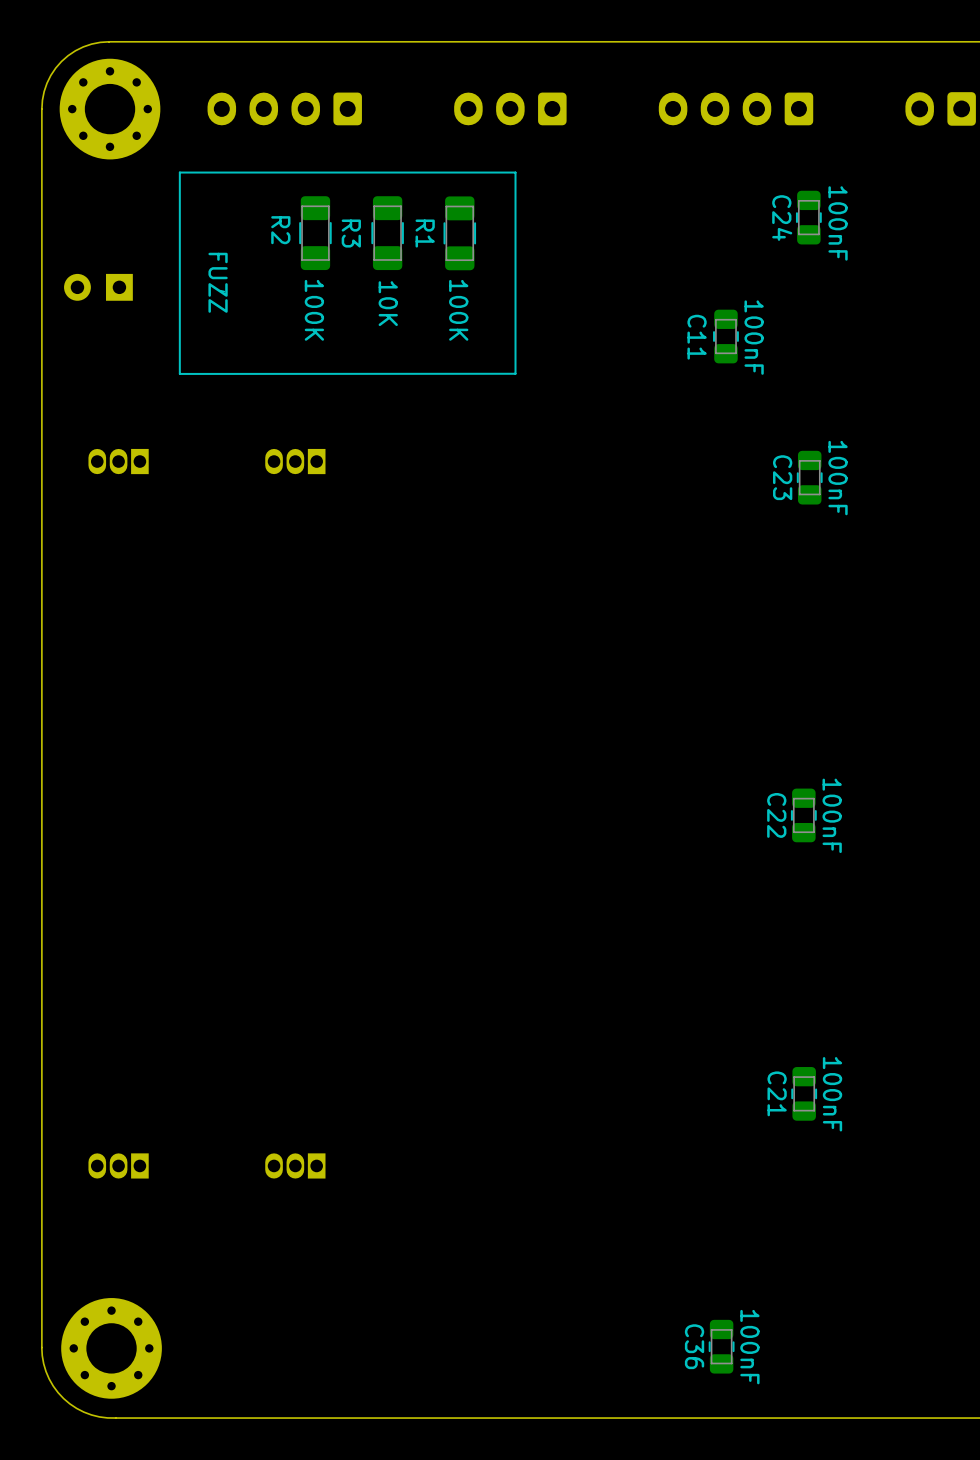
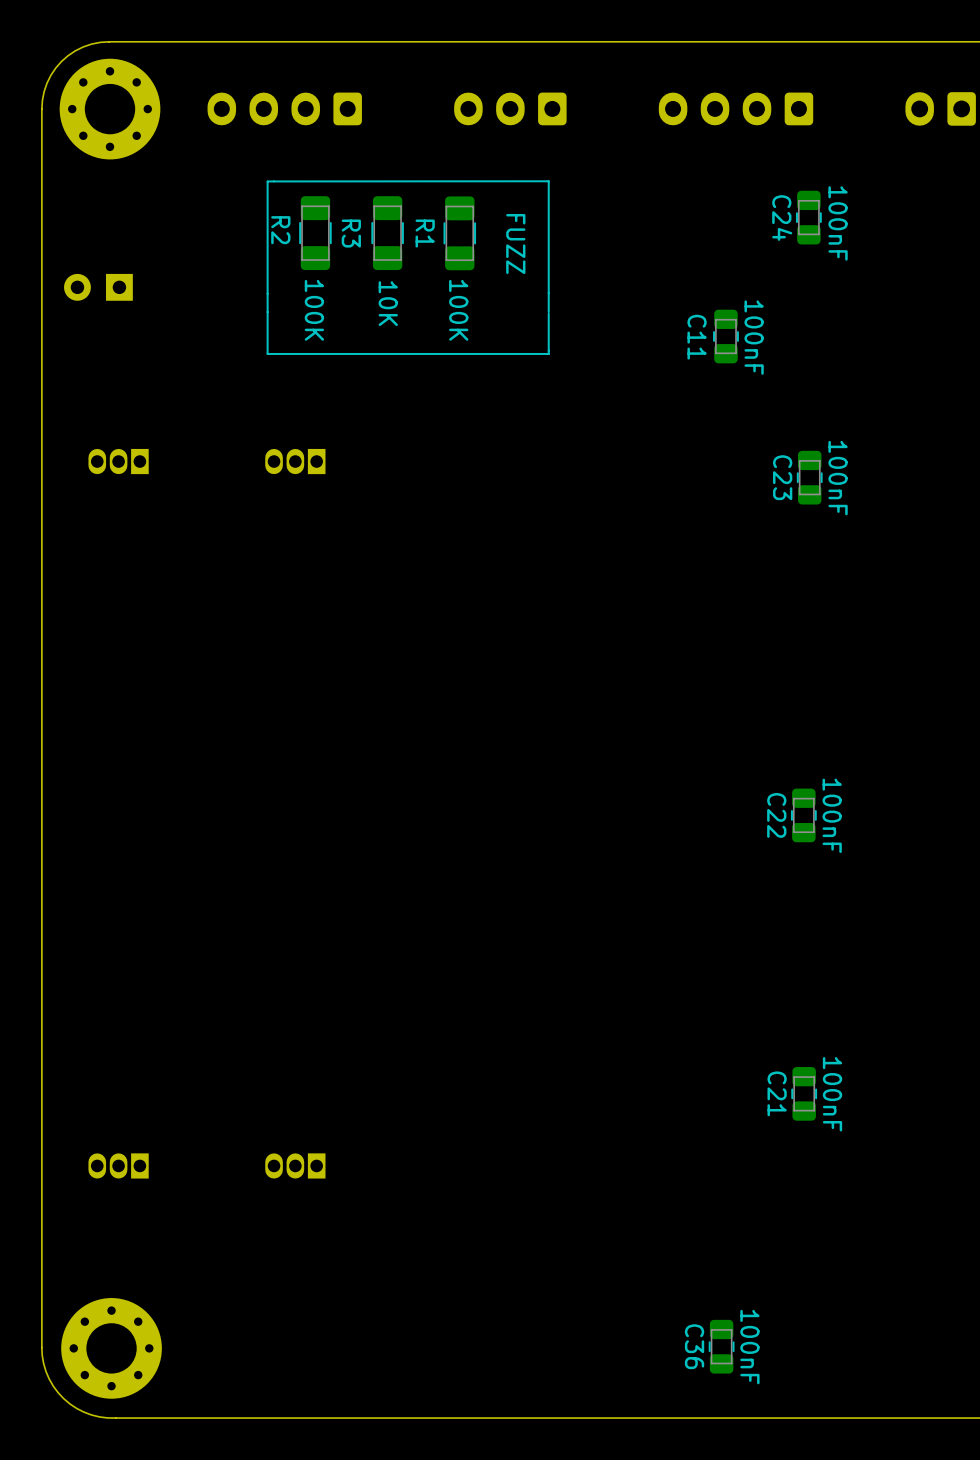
line: (515, 172) (515, 373) (179, 373) (179, 172) (515, 172) -> none
line: none -> (267, 181) (267, 353) (548, 353) (548, 313)
line: none -> (273, 181) (267, 181)
line: none -> (274, 181) (548, 181) (548, 312)
text position: FUZZ (218, 282) -> FUZZ (515, 244)
line: (220, 290) (224, 291) -> none

